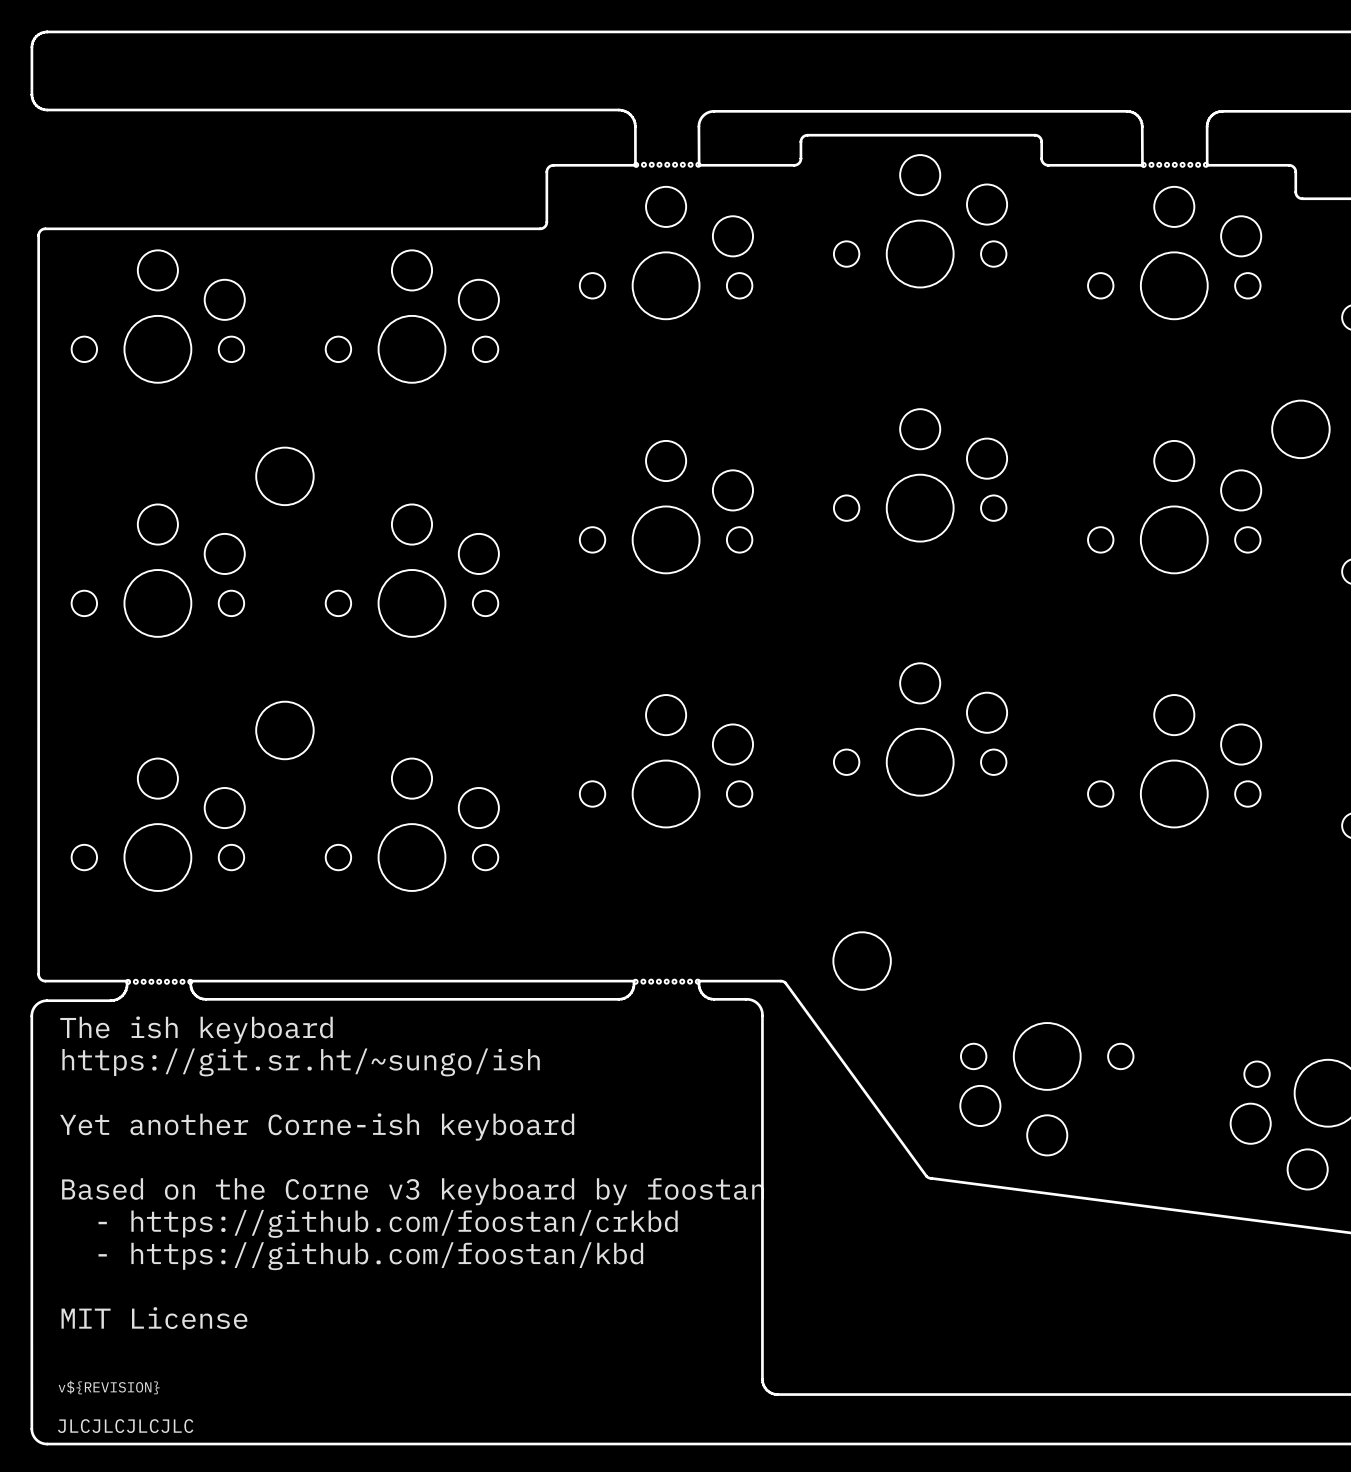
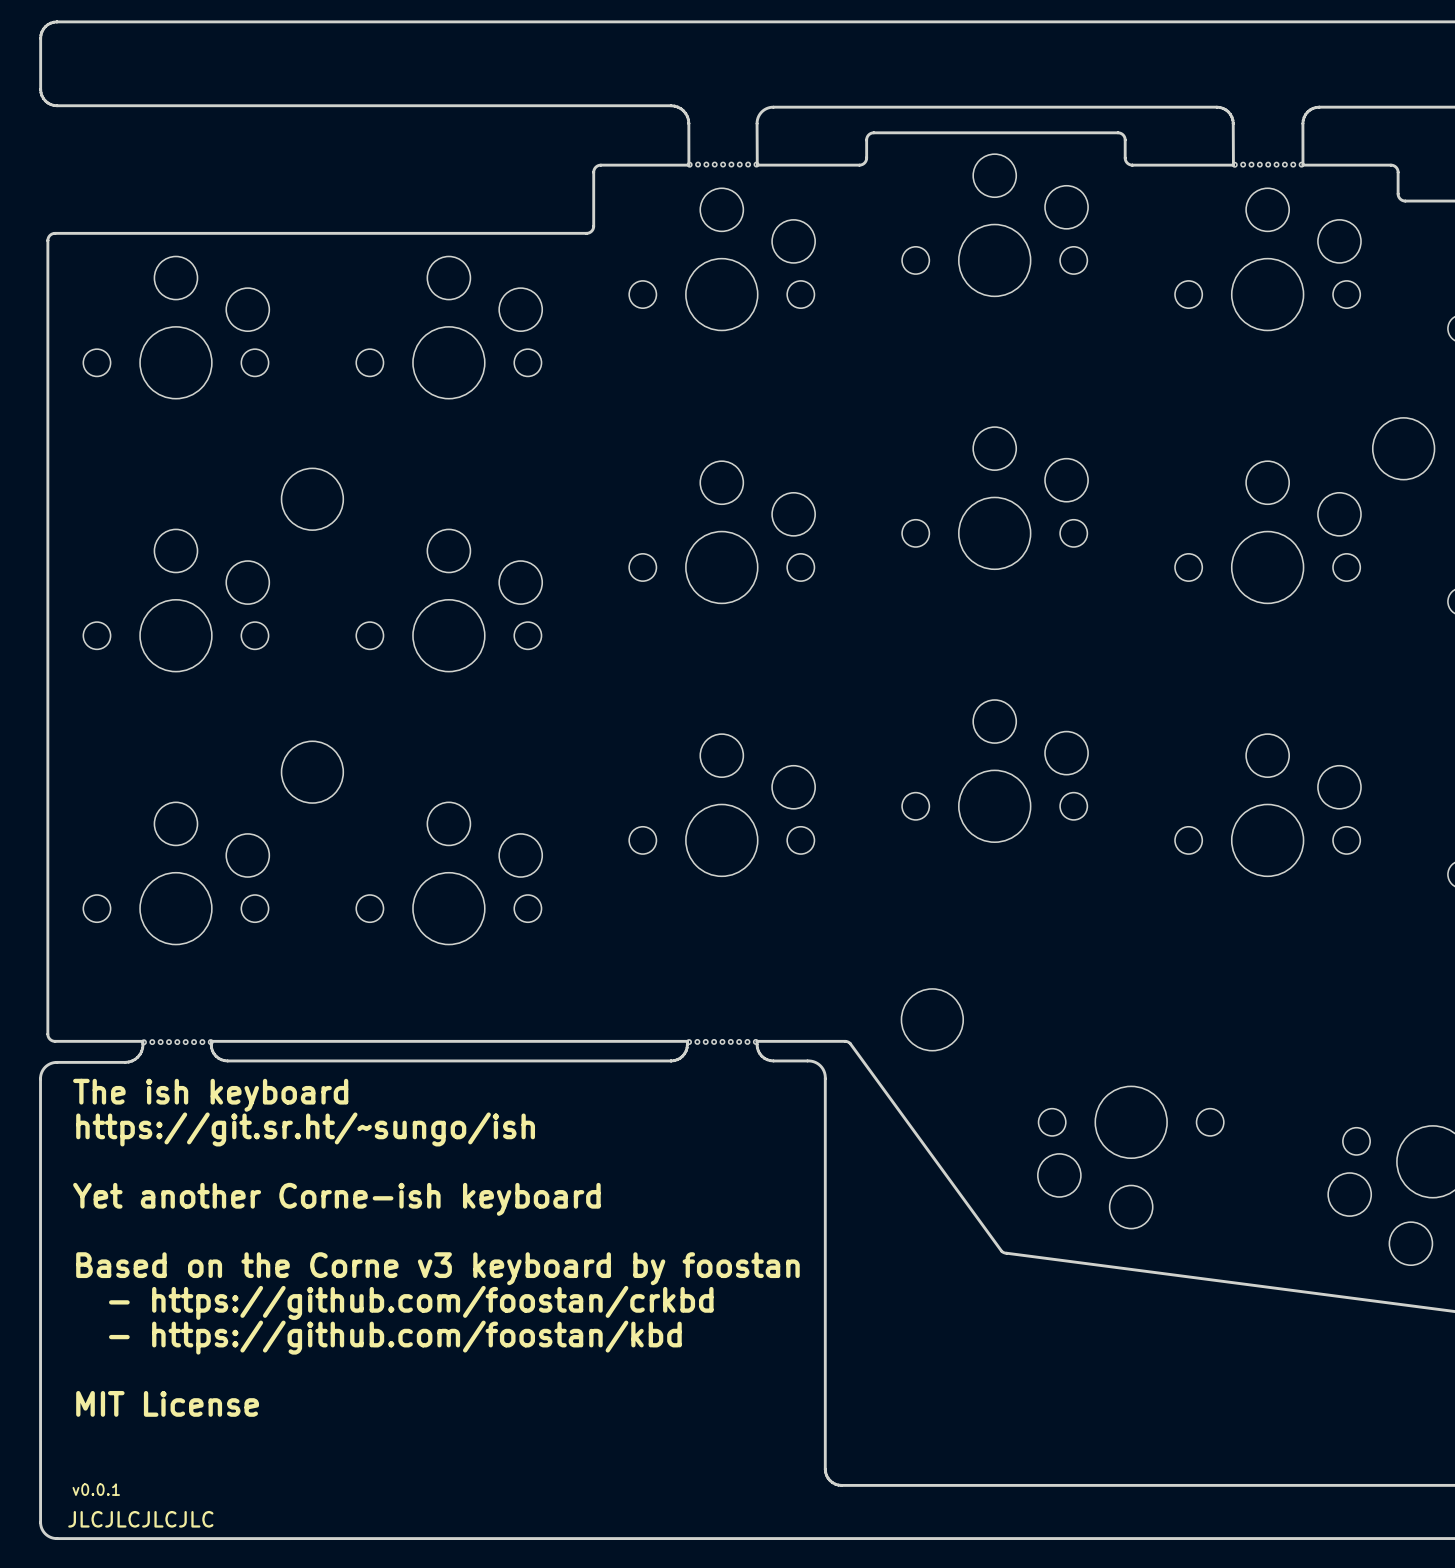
drawing: [58, 1380, 160, 1395] -> none
drawing: none -> [72, 1483, 120, 1496]

